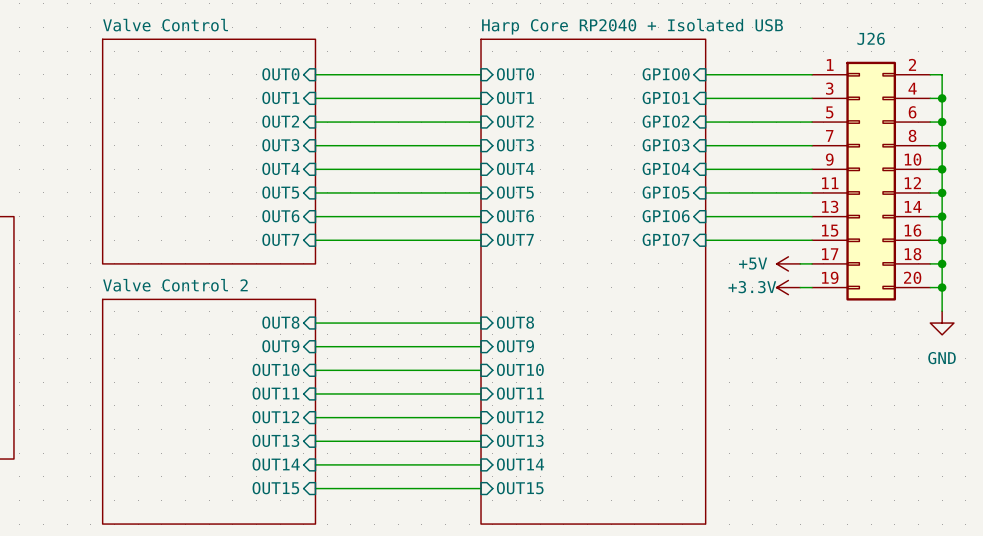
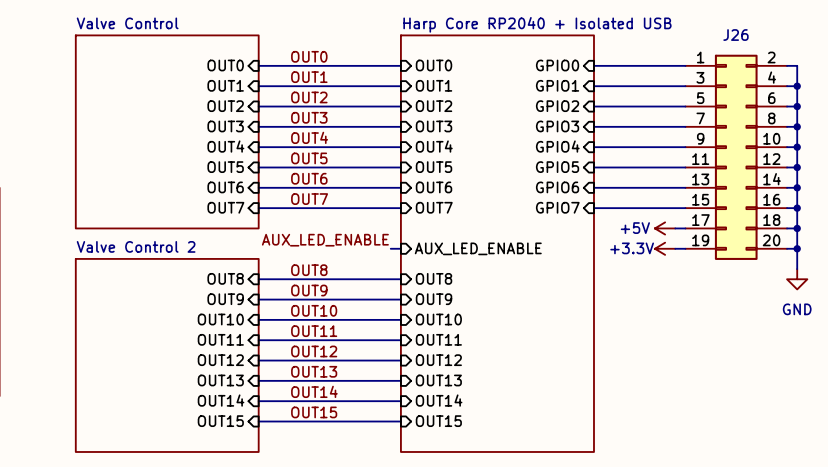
label: none -> OUT0 (309, 56)
label: none -> OUT1 (309, 77)
label: none -> OUT2 (309, 97)
label: none -> OUT3 (309, 117)
label: none -> OUT4 (309, 137)
label: none -> OUT5 (309, 158)
label: none -> OUT6 (309, 178)
label: none -> OUT7 (309, 199)
label: none -> AUX_LED_ENABLE (325, 240)
wire: none -> (390, 248) (400, 248)
sheet pin: none -> AUX_LED_ENABLE (478, 248)
label: none -> OUT8 (309, 270)
label: none -> OUT9 (309, 290)
label: none -> OUT10 (314, 310)
label: none -> OUT11 (314, 331)
label: none -> OUT12 (314, 351)
label: none -> OUT13 (314, 371)
label: none -> OUT14 (314, 391)
label: none -> OUT15 (314, 412)

